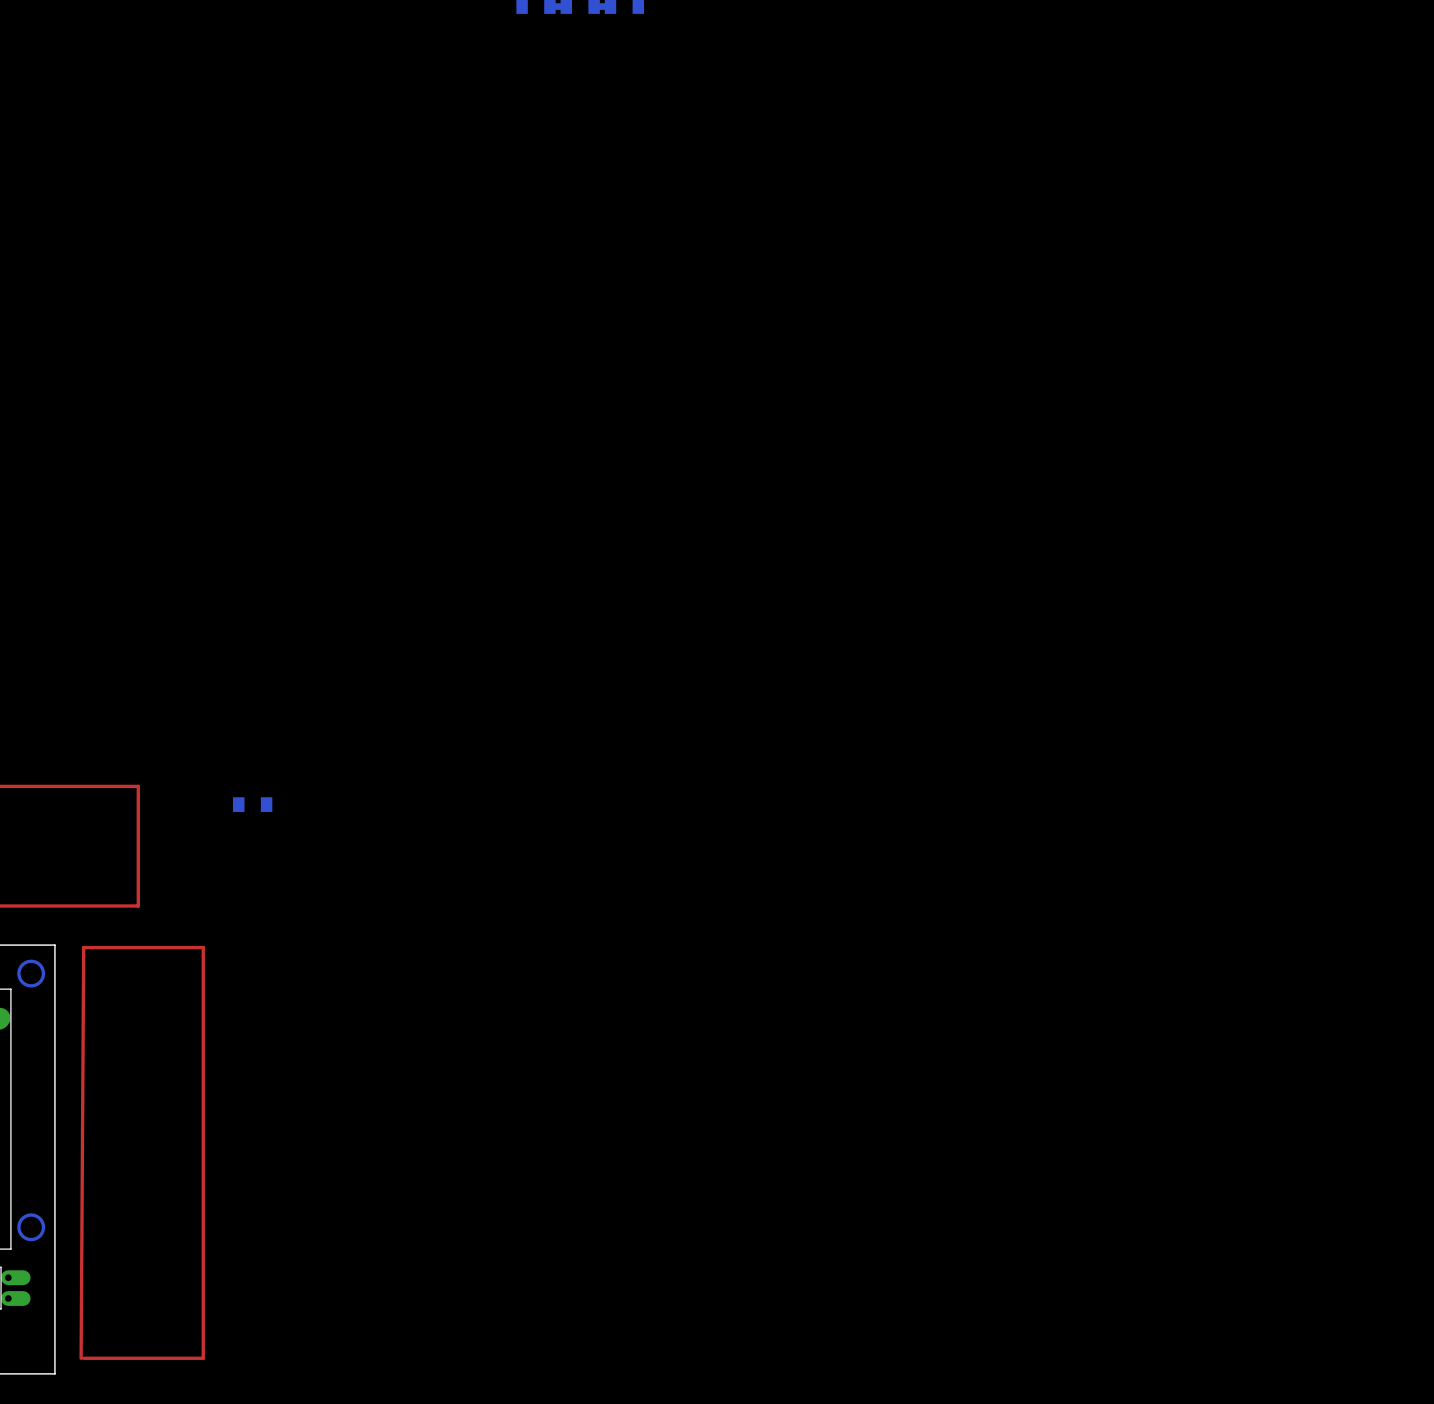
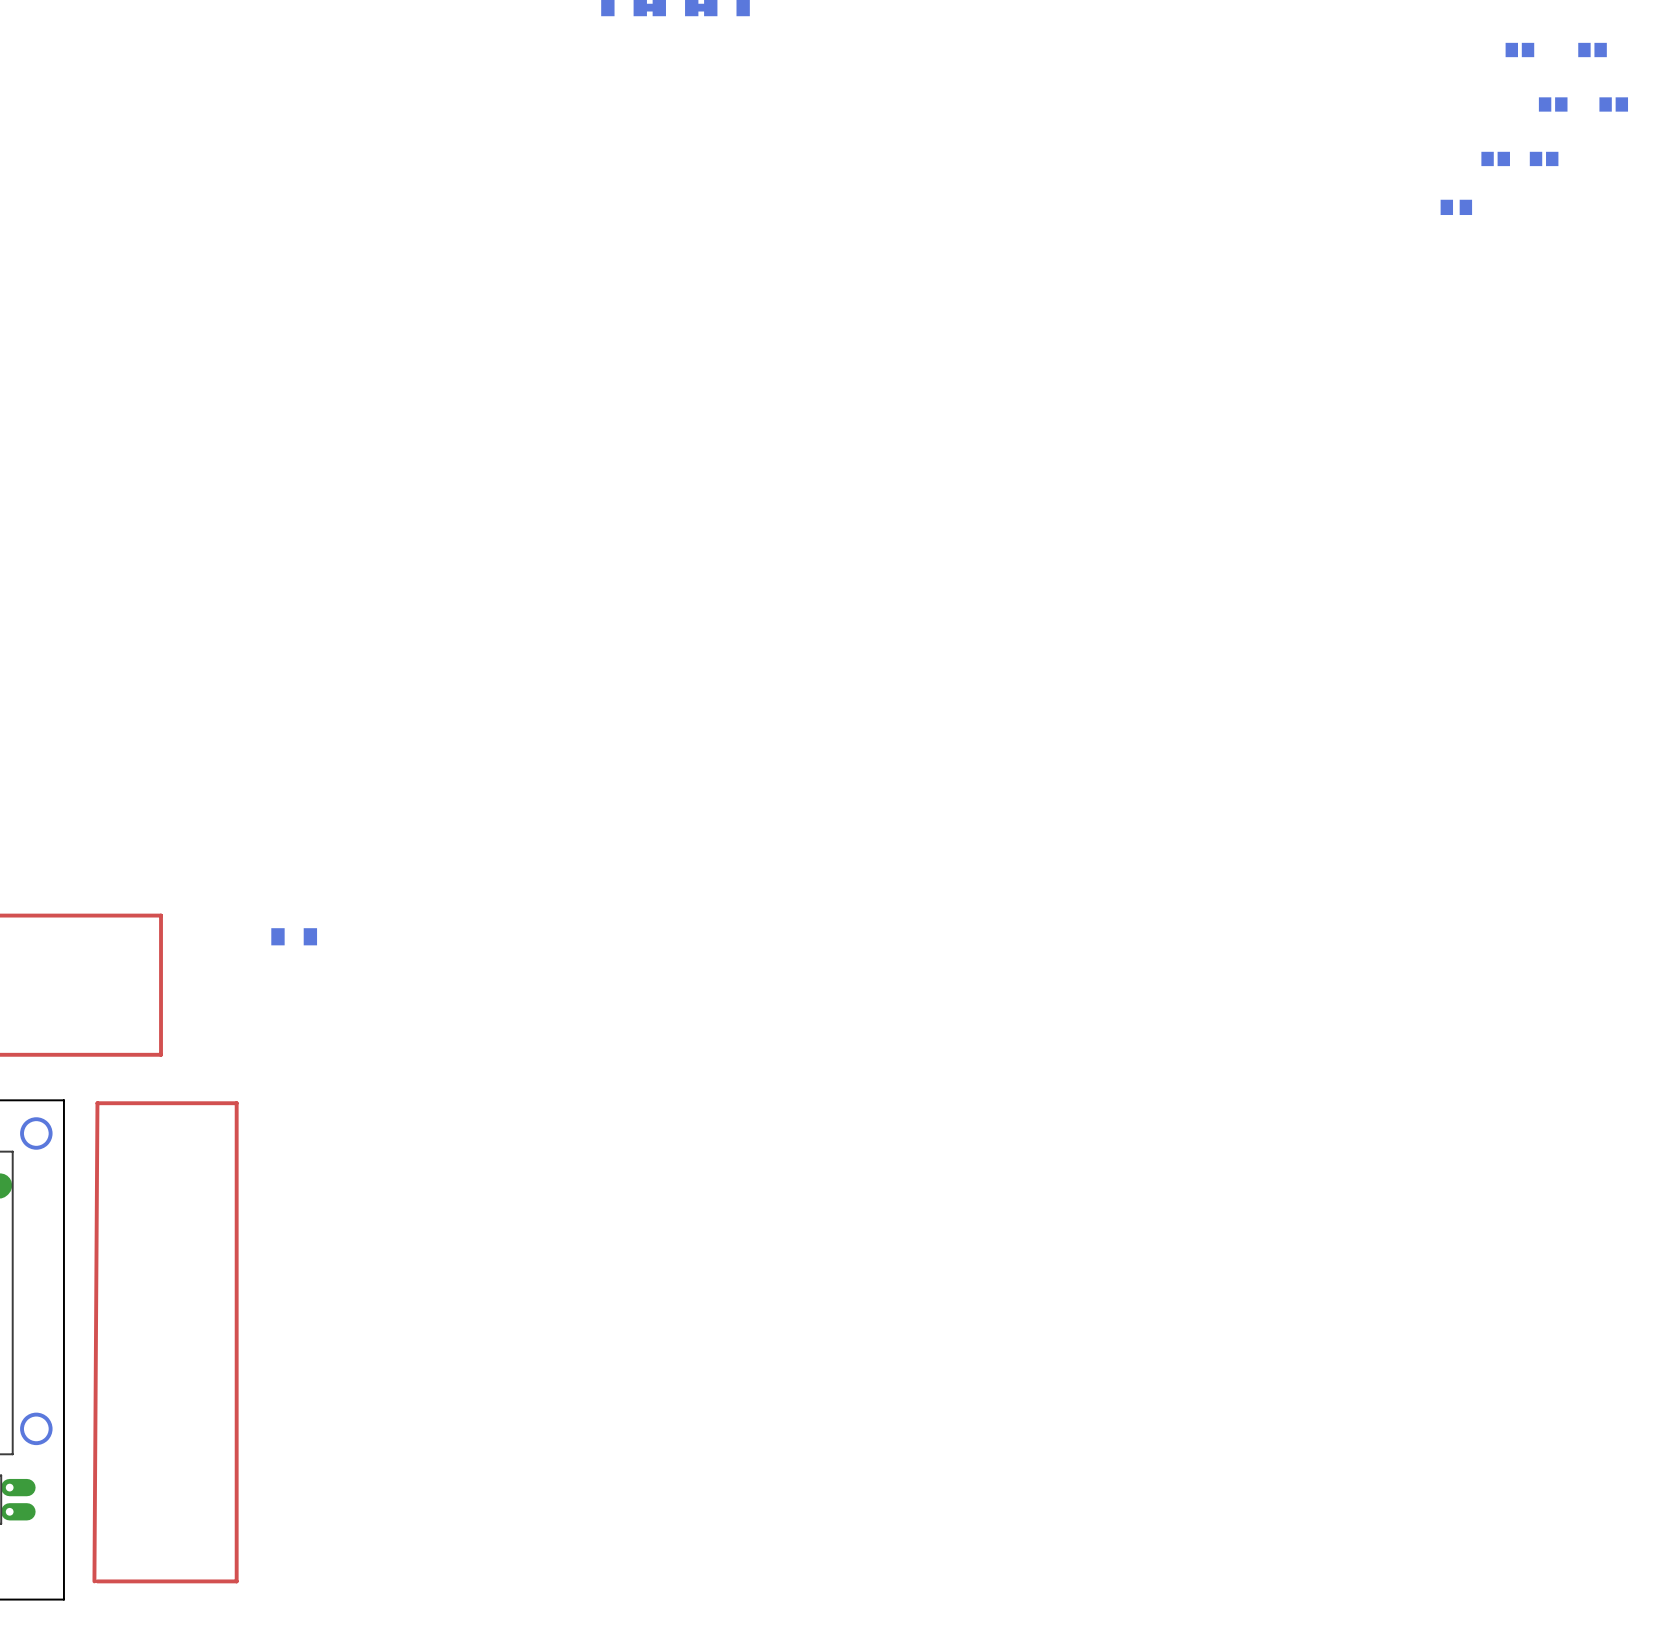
part: none -> (1519, 50)
part: none -> (1592, 50)
part: none -> (1553, 104)
part: none -> (1613, 104)
part: none -> (1495, 158)
part: none -> (1544, 158)
part: none -> (1456, 207)

